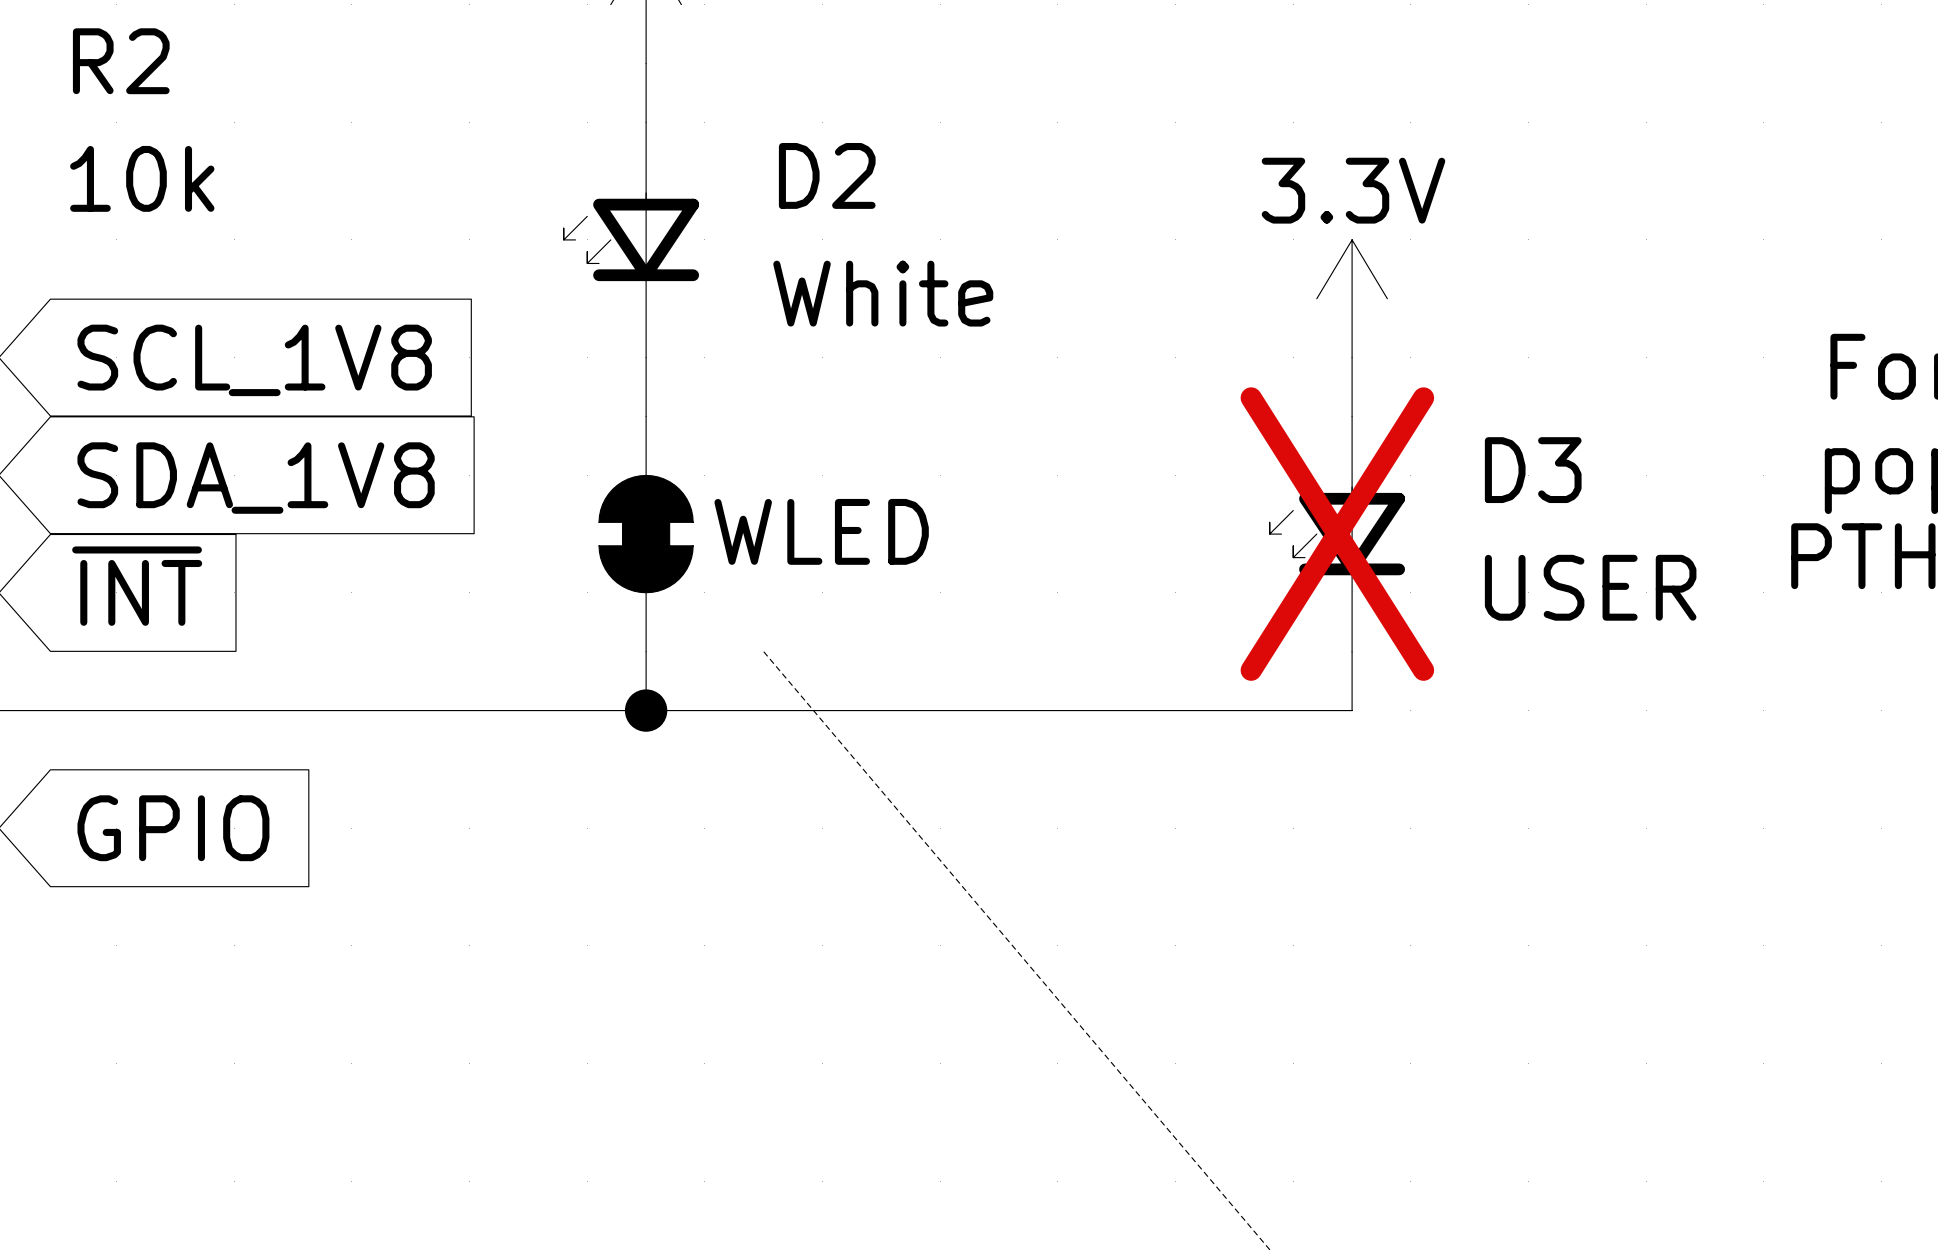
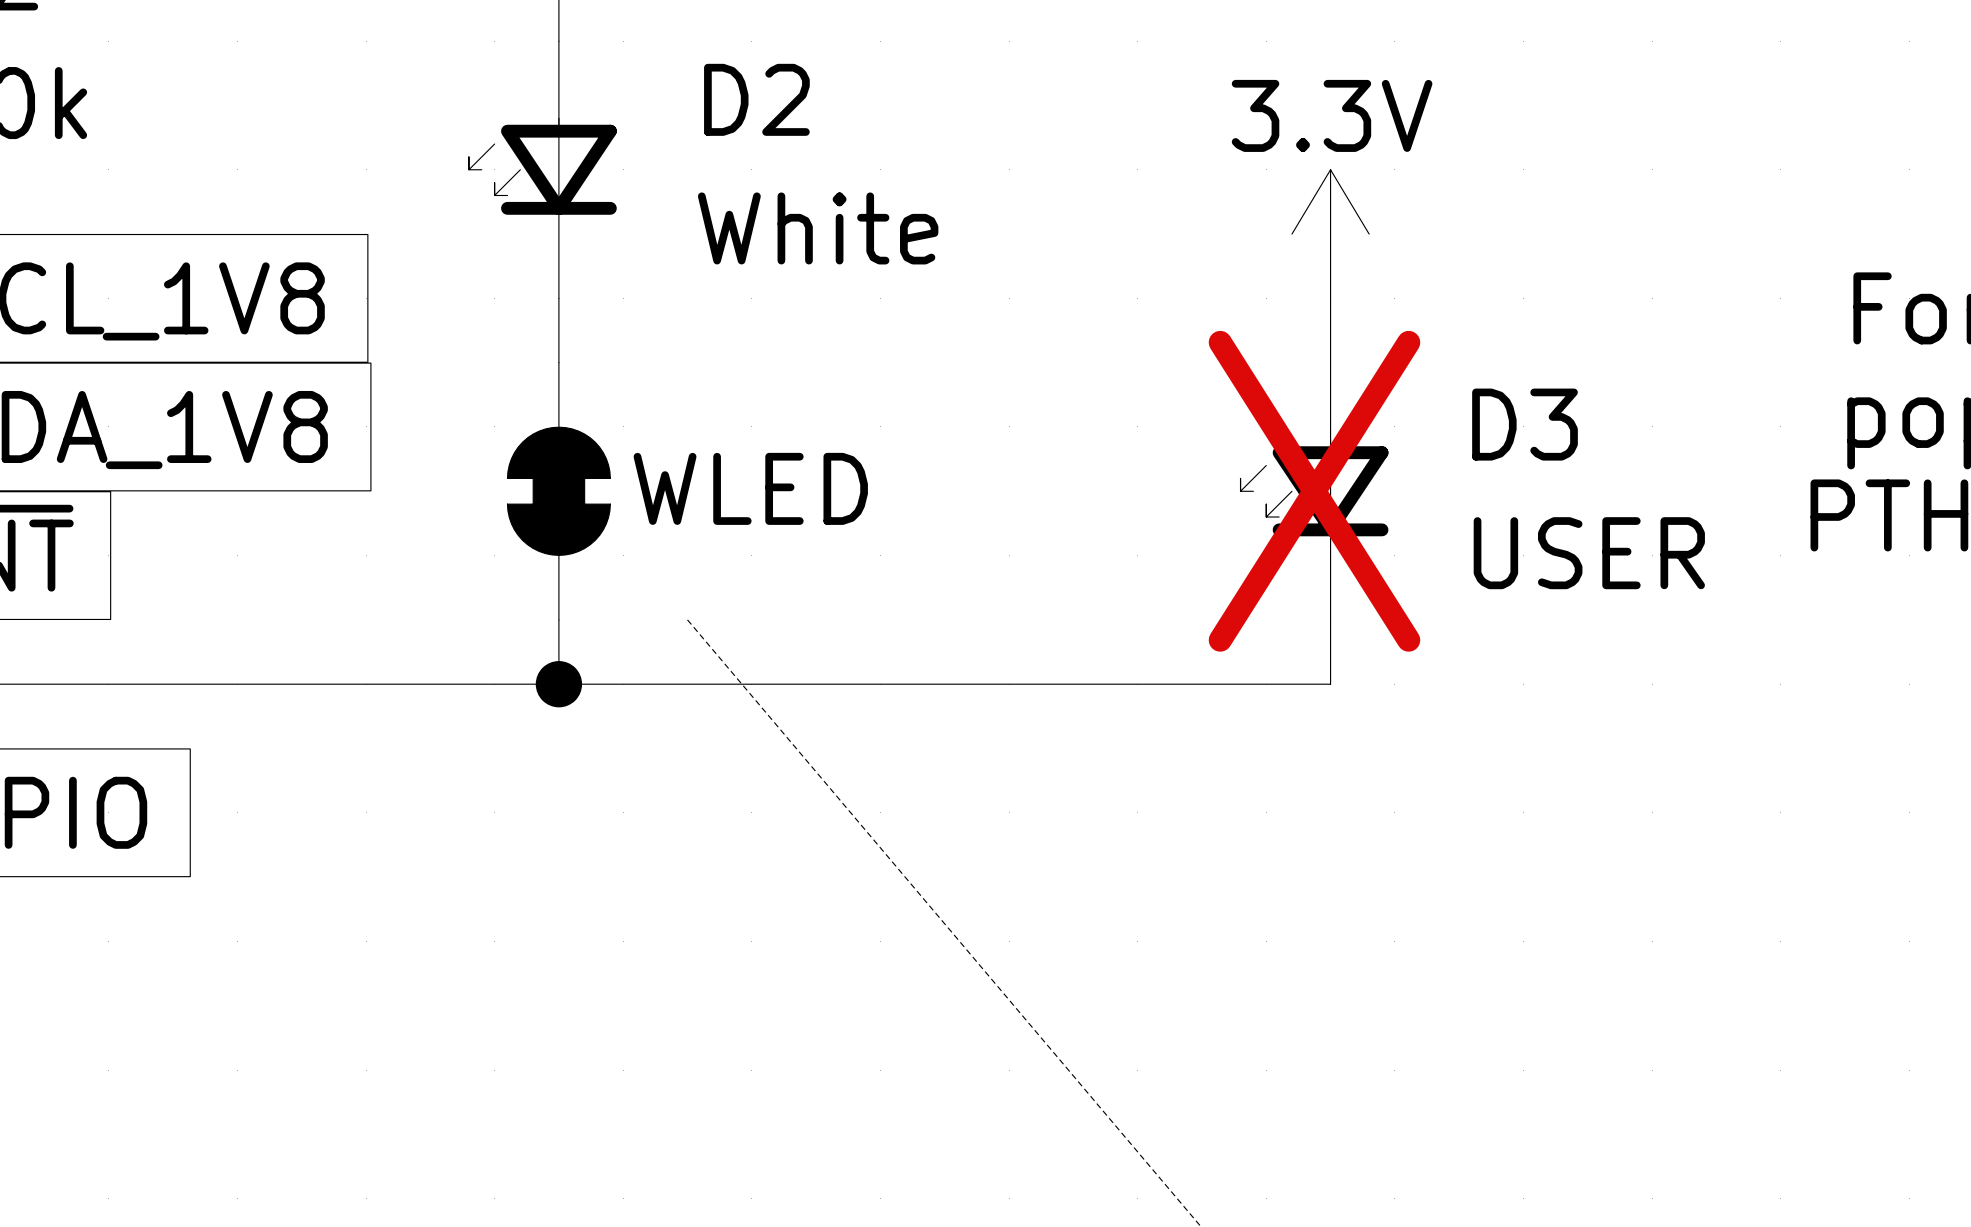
D3 name position: D3 (1533, 470) -> D3 (1525, 424)
D3 value position: USER (1590, 587) -> USER (1589, 553)

